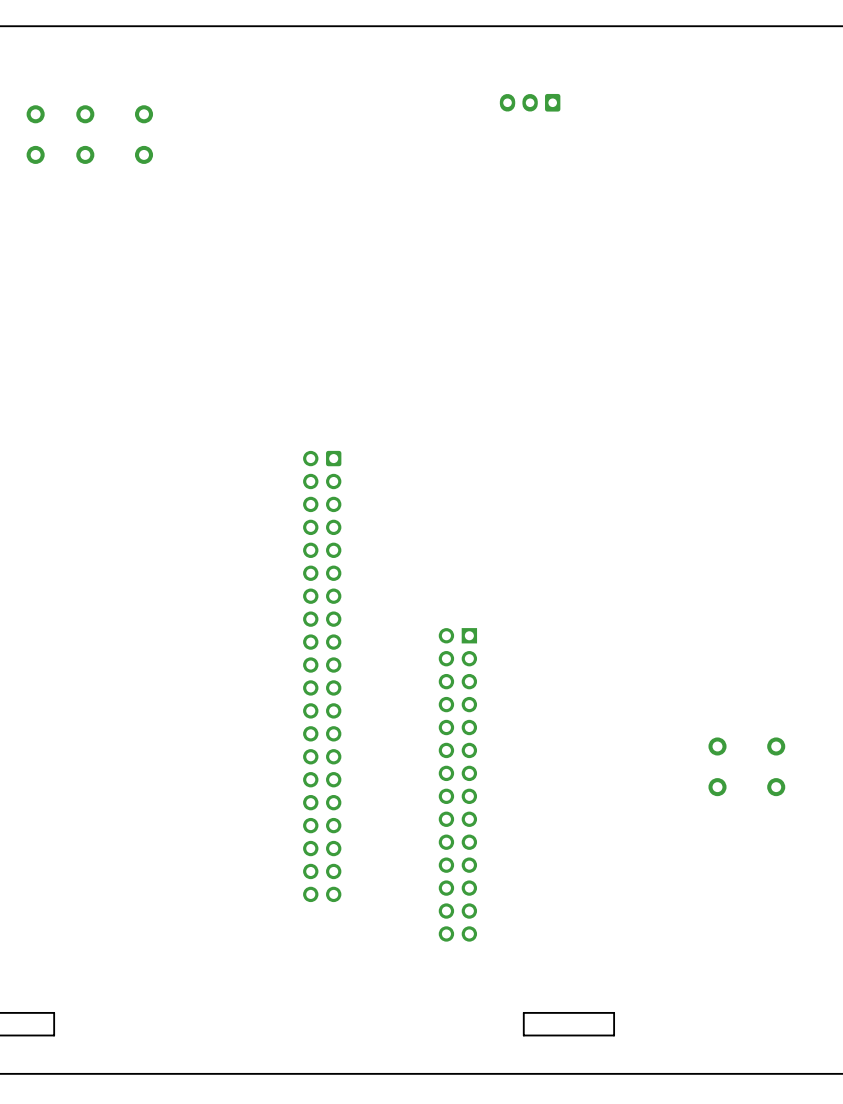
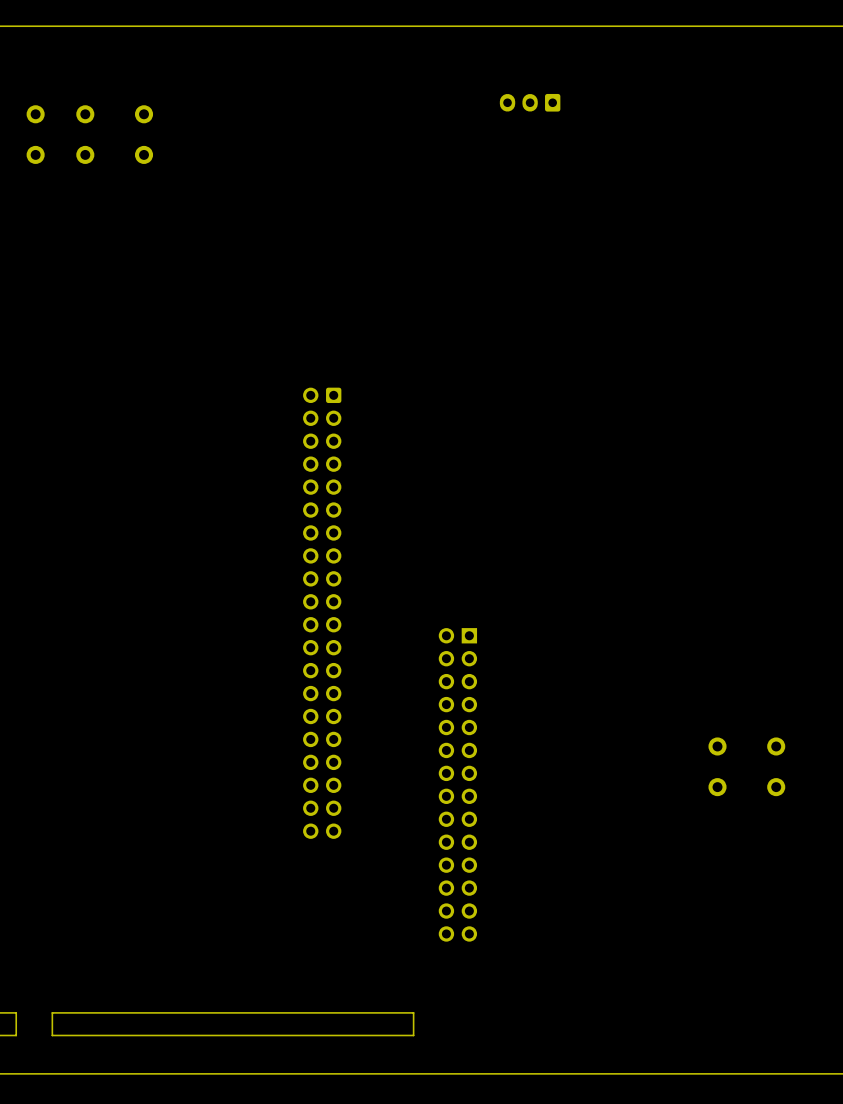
part position: (322, 676) -> (322, 613)
board edge: (16, 1012) (52, 1012) -> (16, 1012) (16, 1035)
board edge: (54, 1012) (54, 1035) -> (54, 1012) (413, 1012) (413, 1035) (54, 1035)
board edge: (523, 1012) (614, 1012) (614, 1035) (523, 1035) (523, 1012) -> none
board edge: (16, 1035) (52, 1035) -> (52, 1012) (52, 1035)

